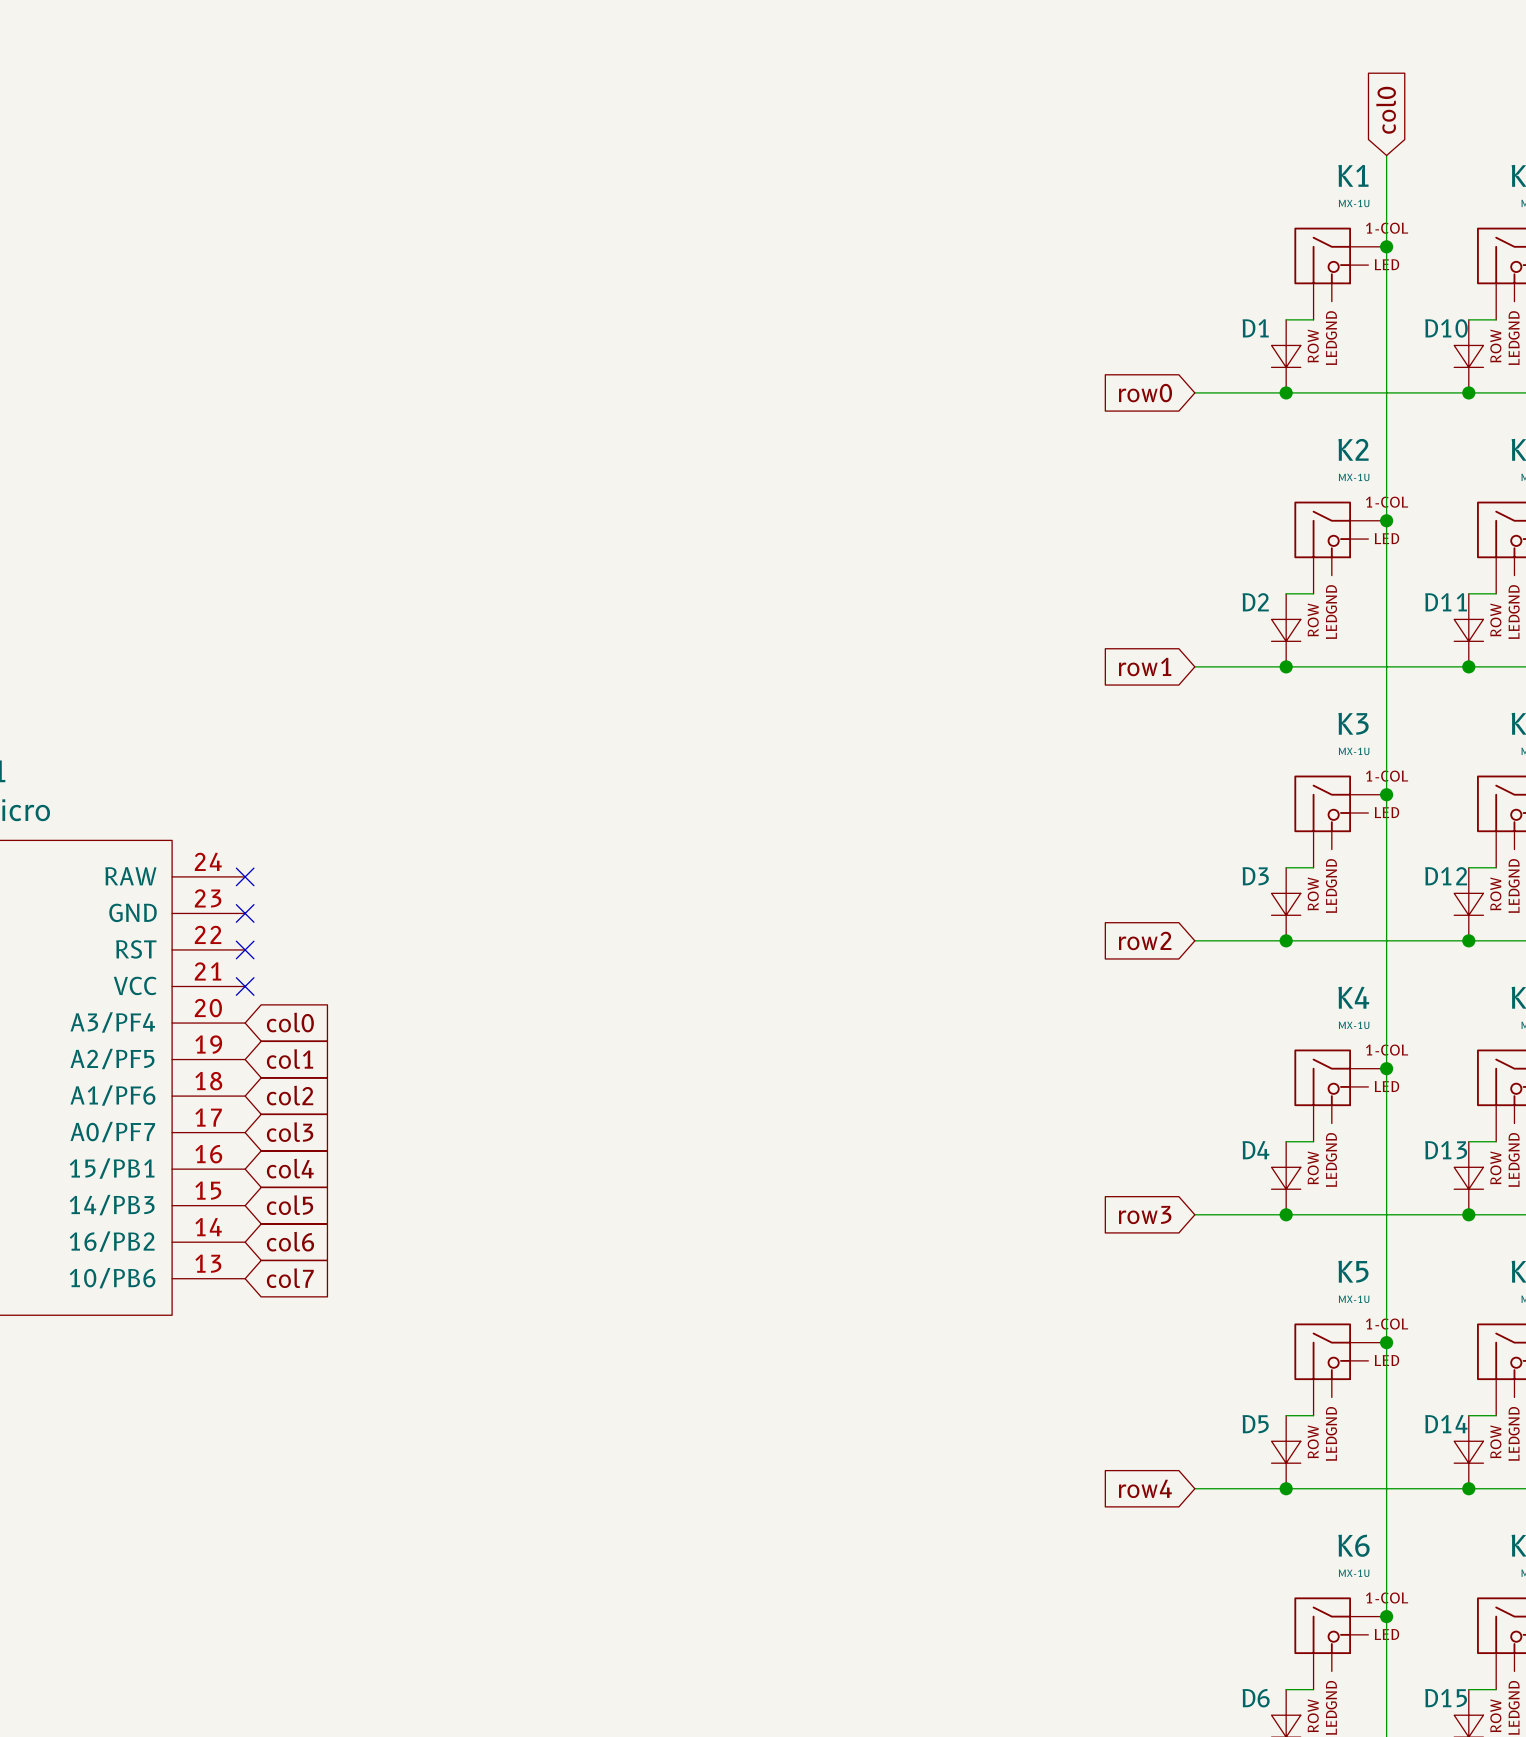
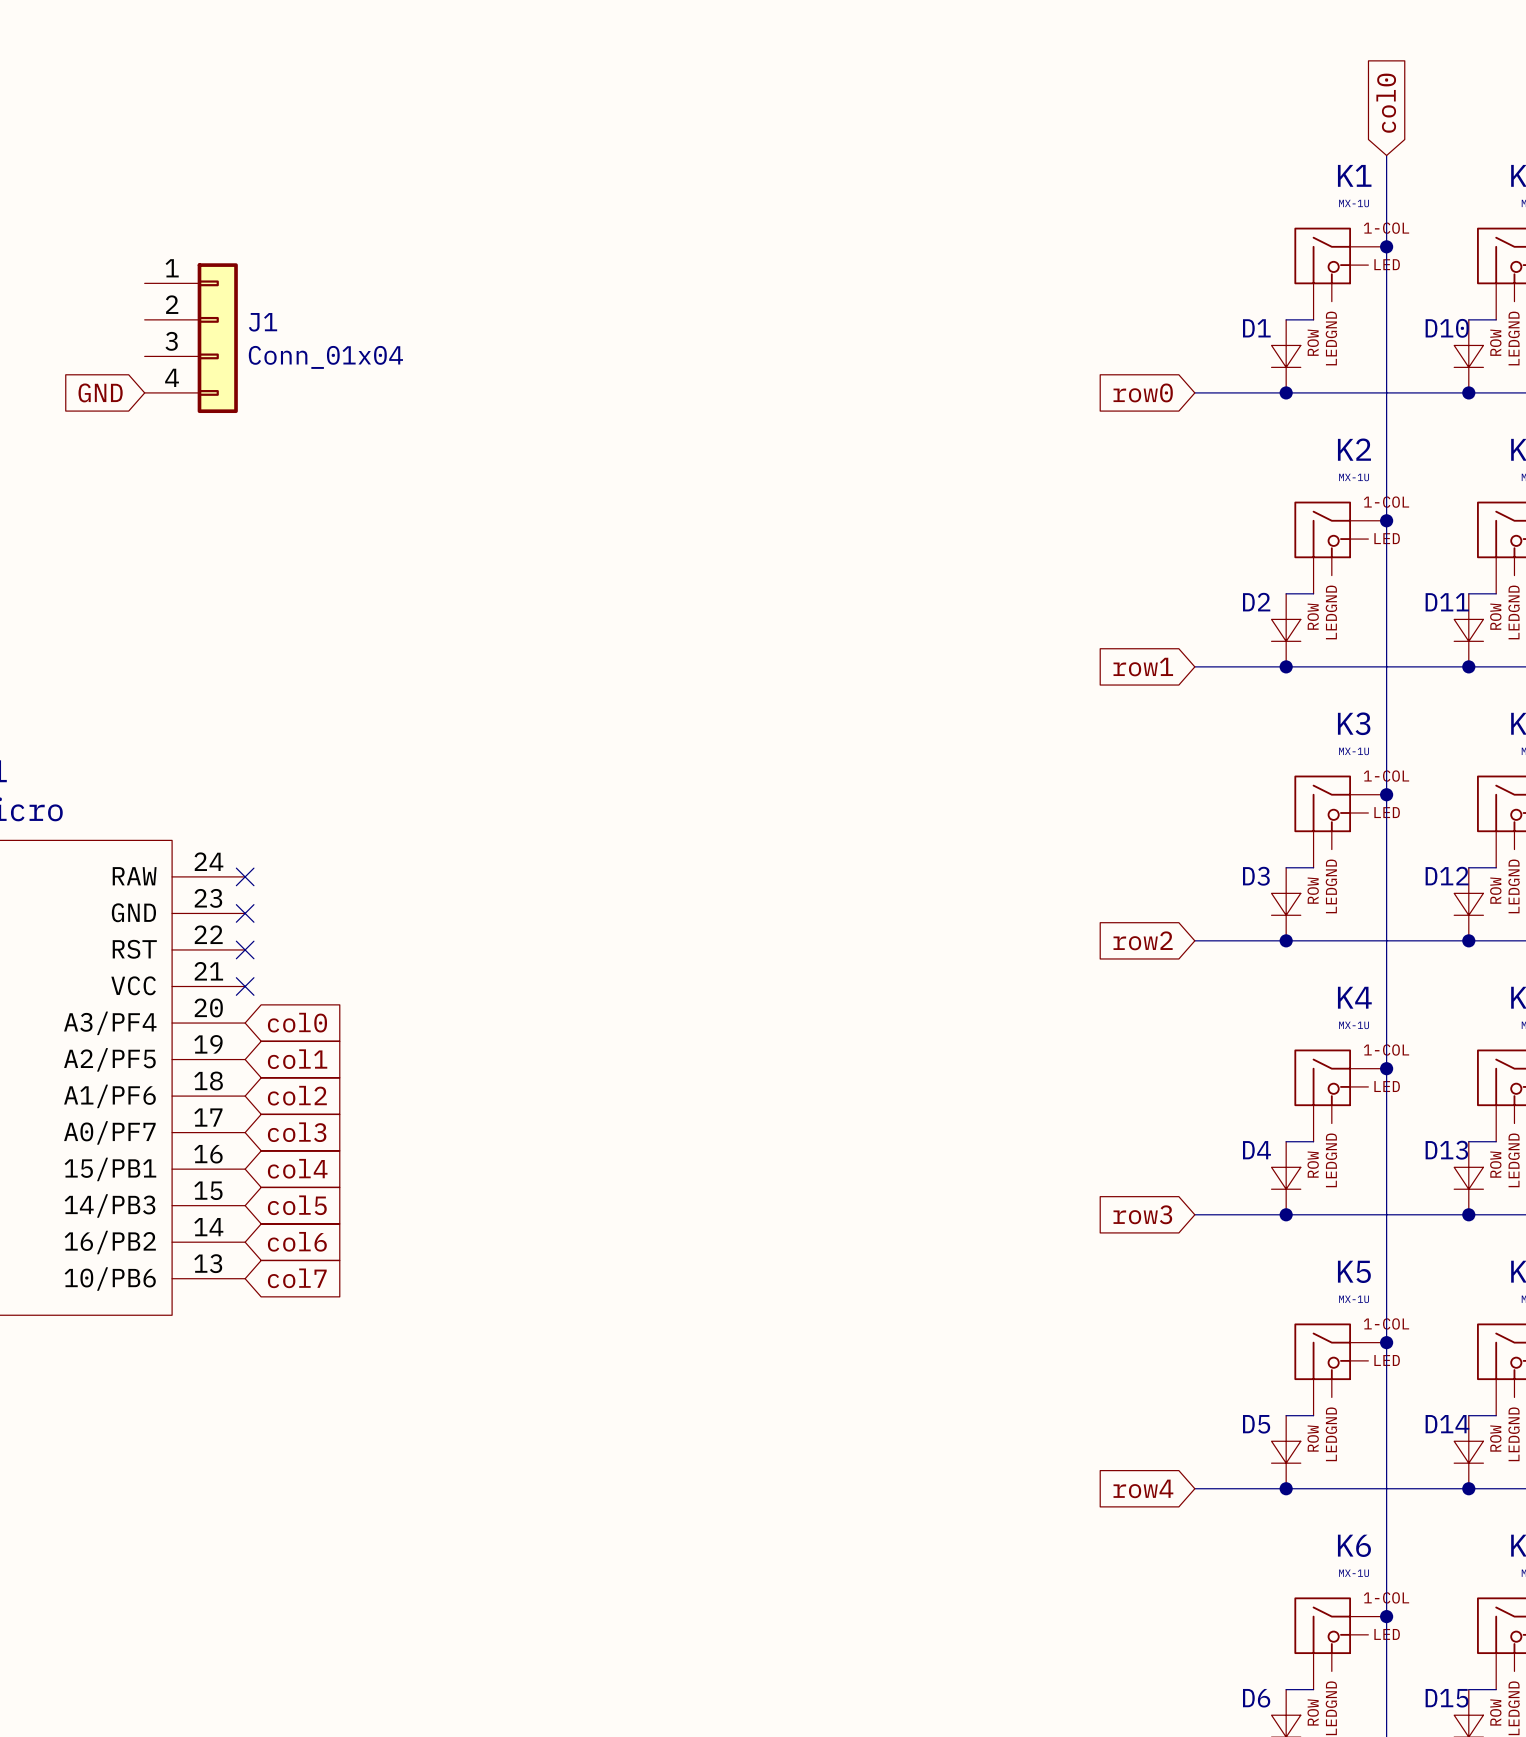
J1: none -> Conn_01x04 (191, 338)
global label: none -> GND (100, 392)

